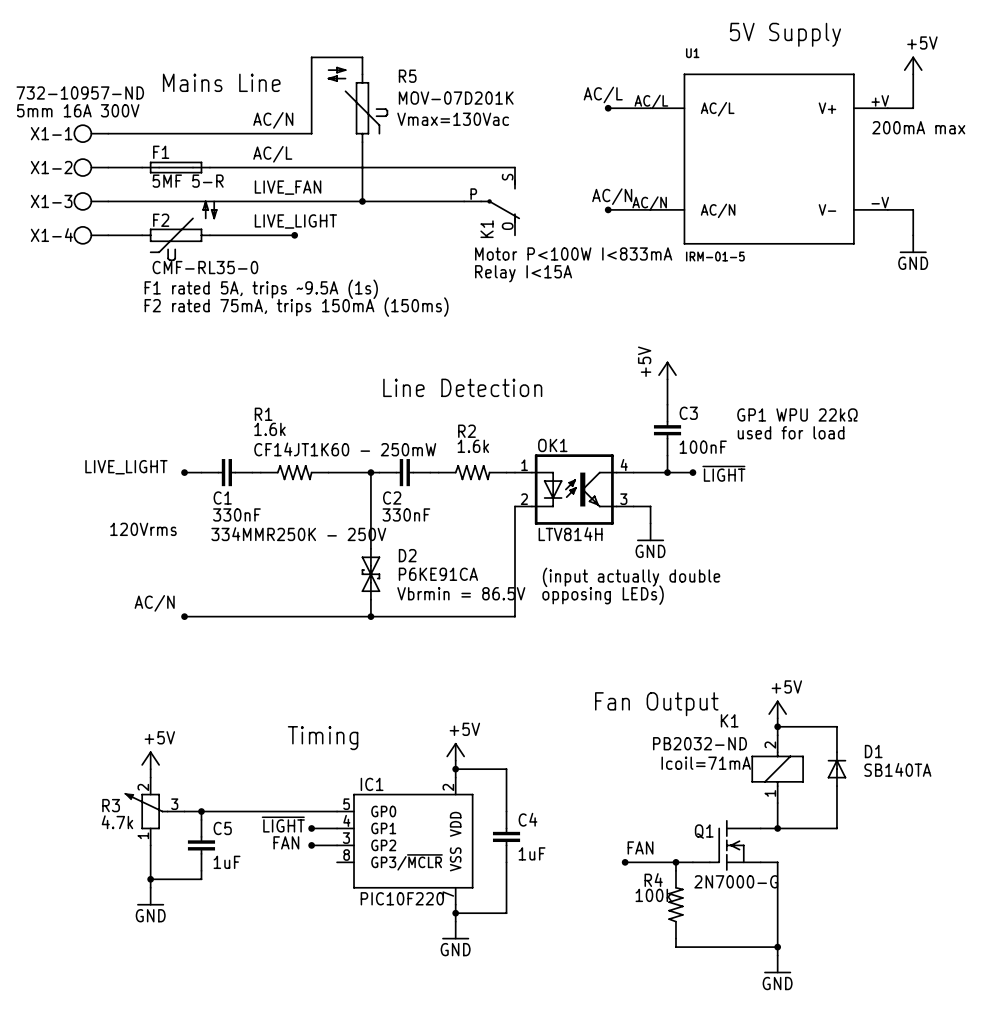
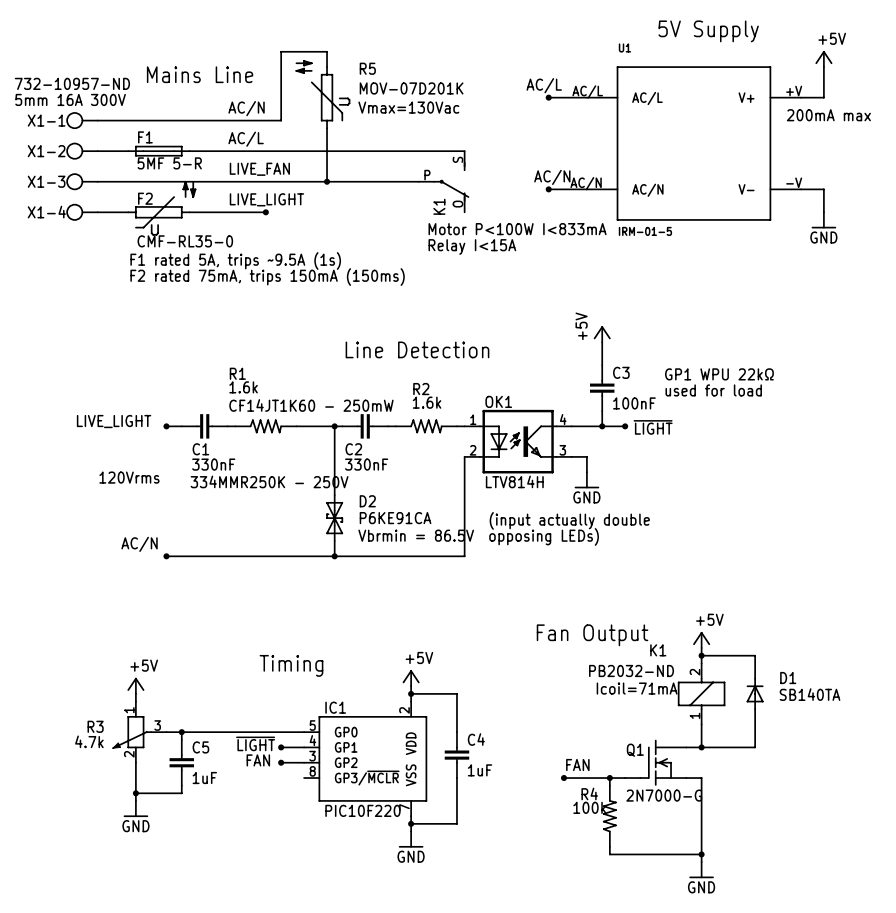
R3 flip: as is (146, 811) -> up-down (132, 732)
R3 value position: 4.7k (117, 822) -> 4.7k (89, 741)

